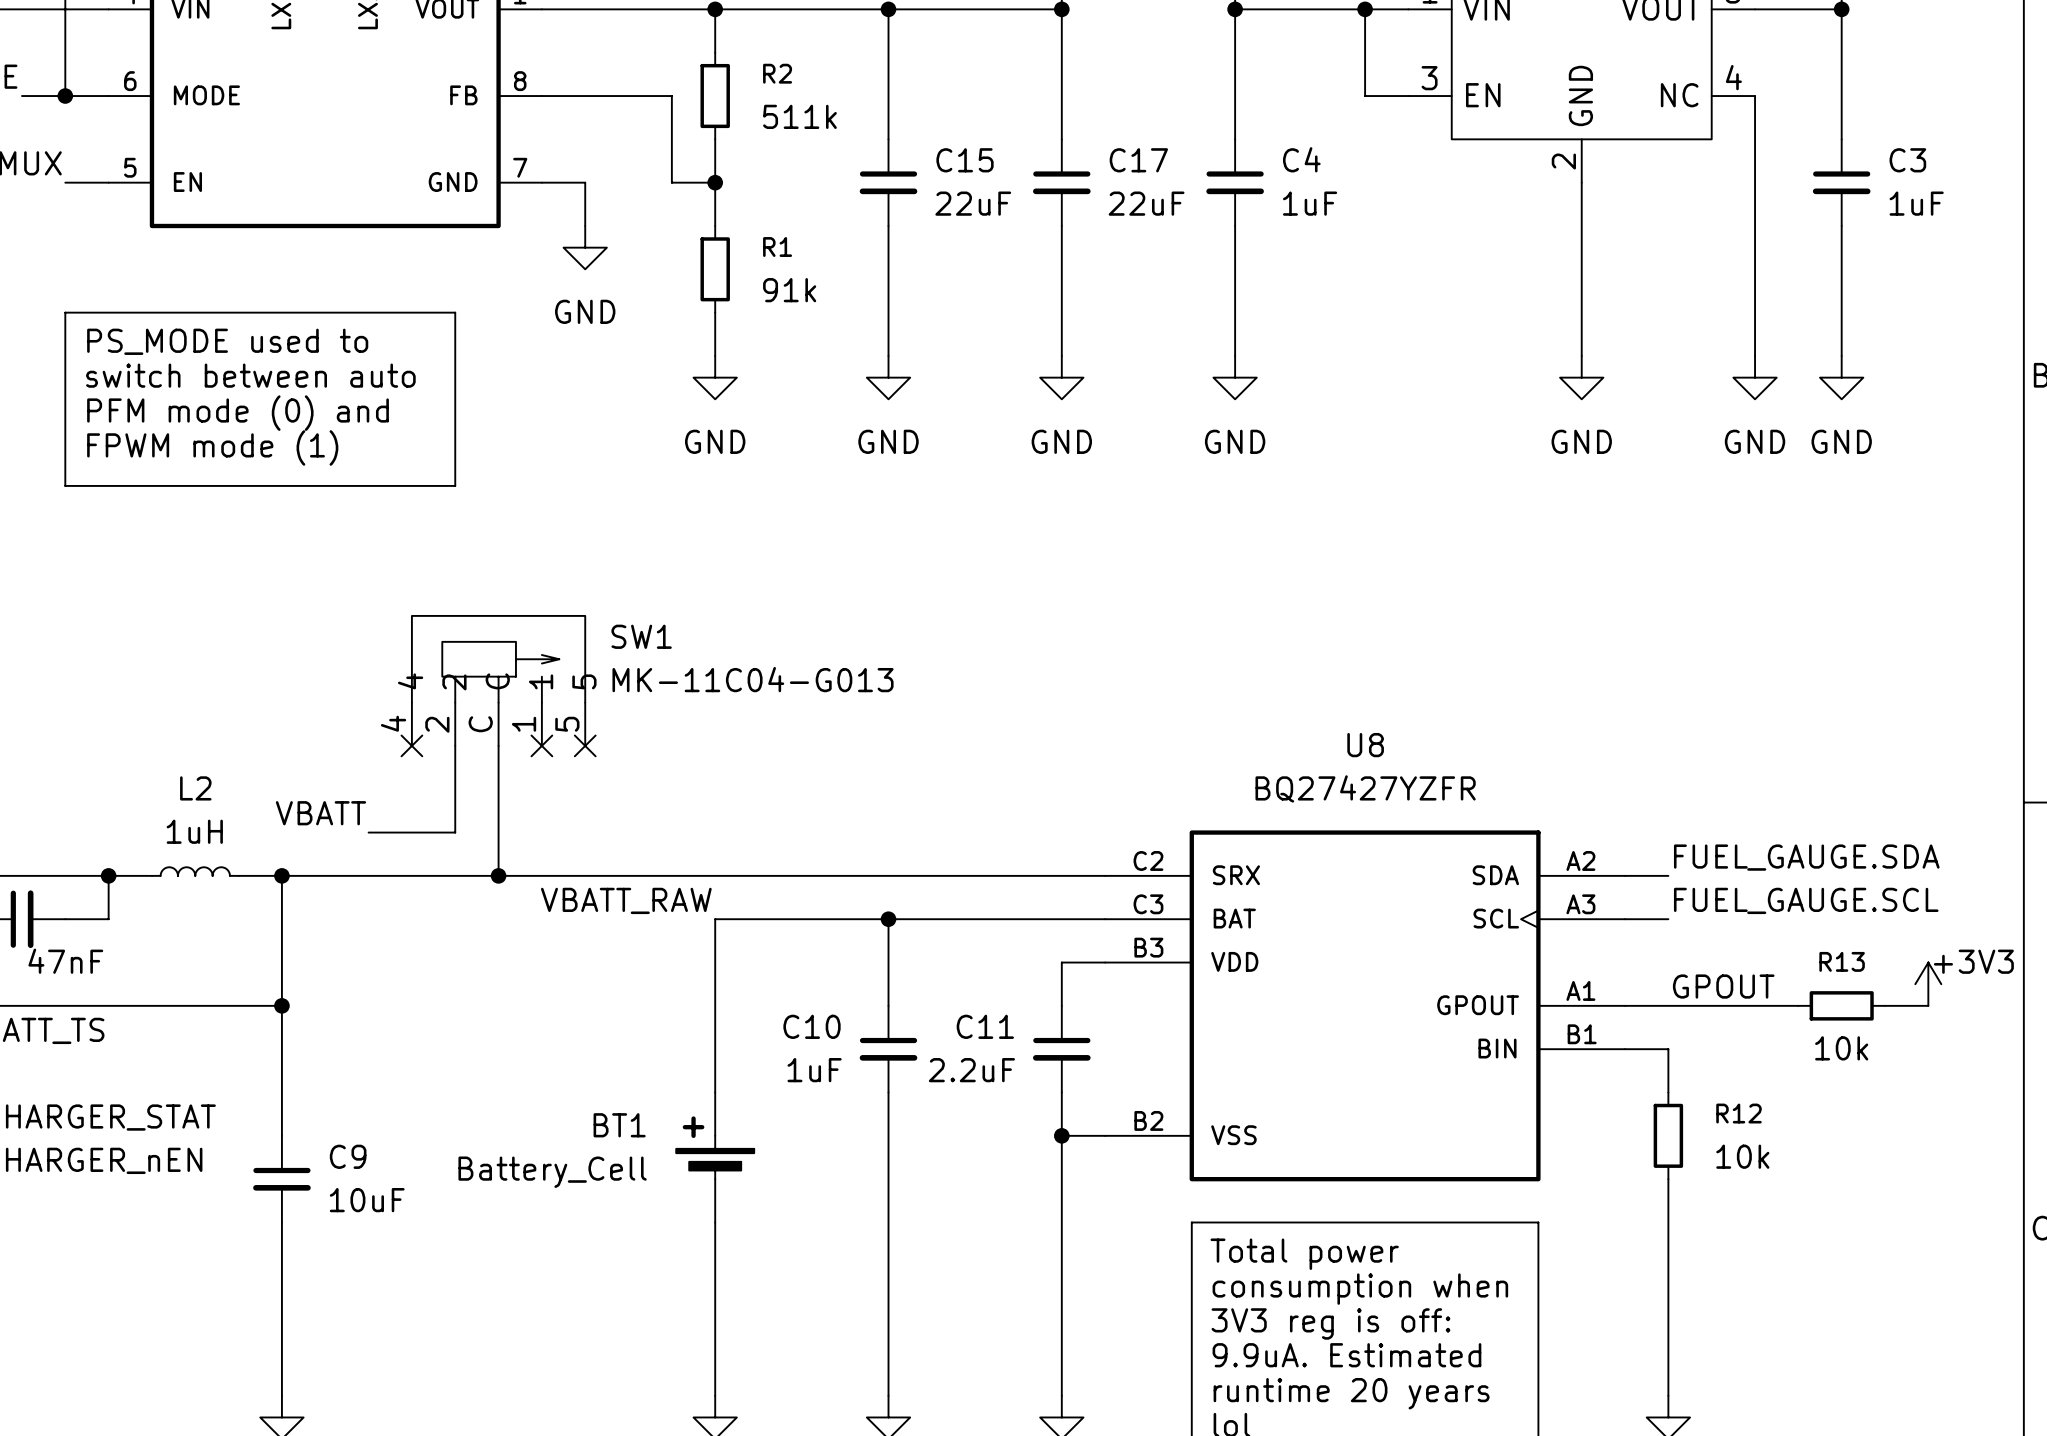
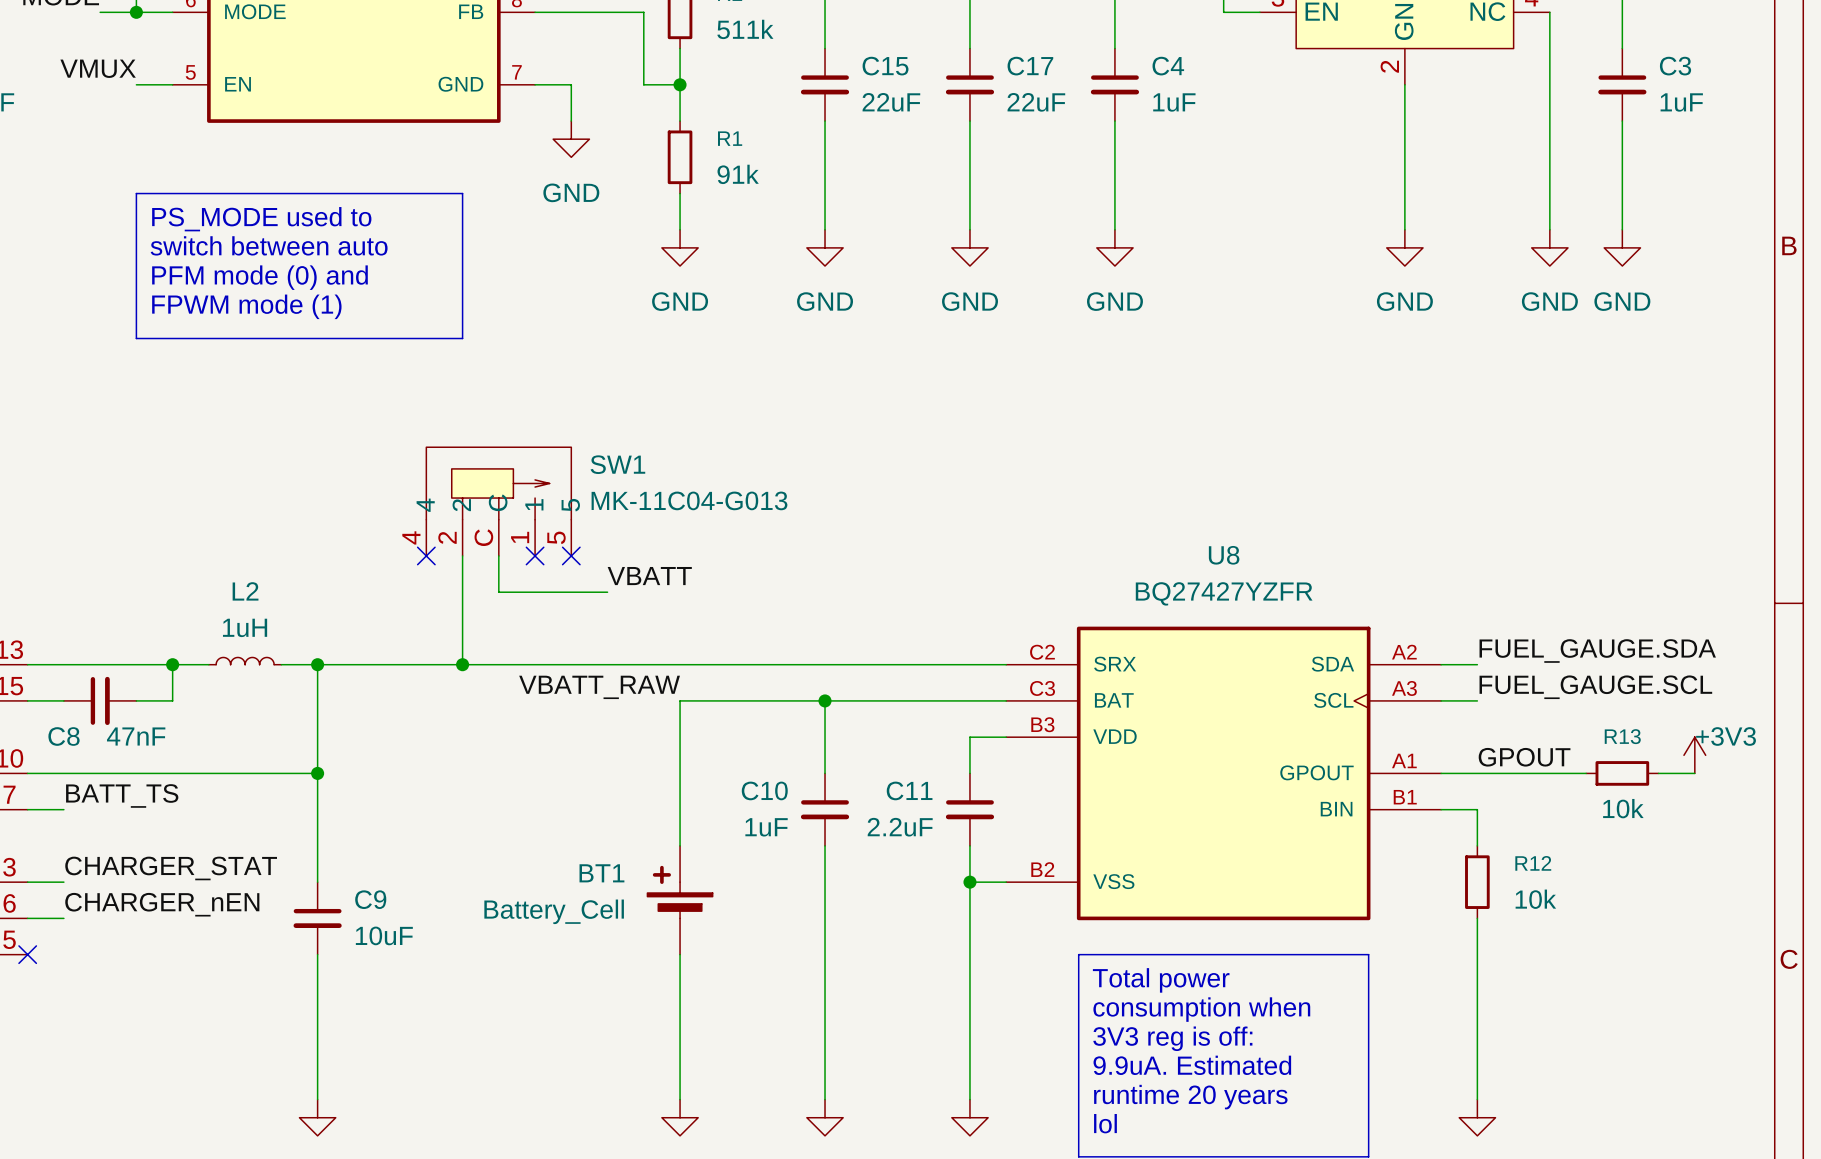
wire: (498, 789) (498, 875) -> (498, 592) (607, 592)
label position: VBATT (320, 813) -> VBATT (649, 576)
wire: (368, 832) (455, 832) -> (462, 664) (462, 628)
junction position: (498, 875) -> (462, 664)

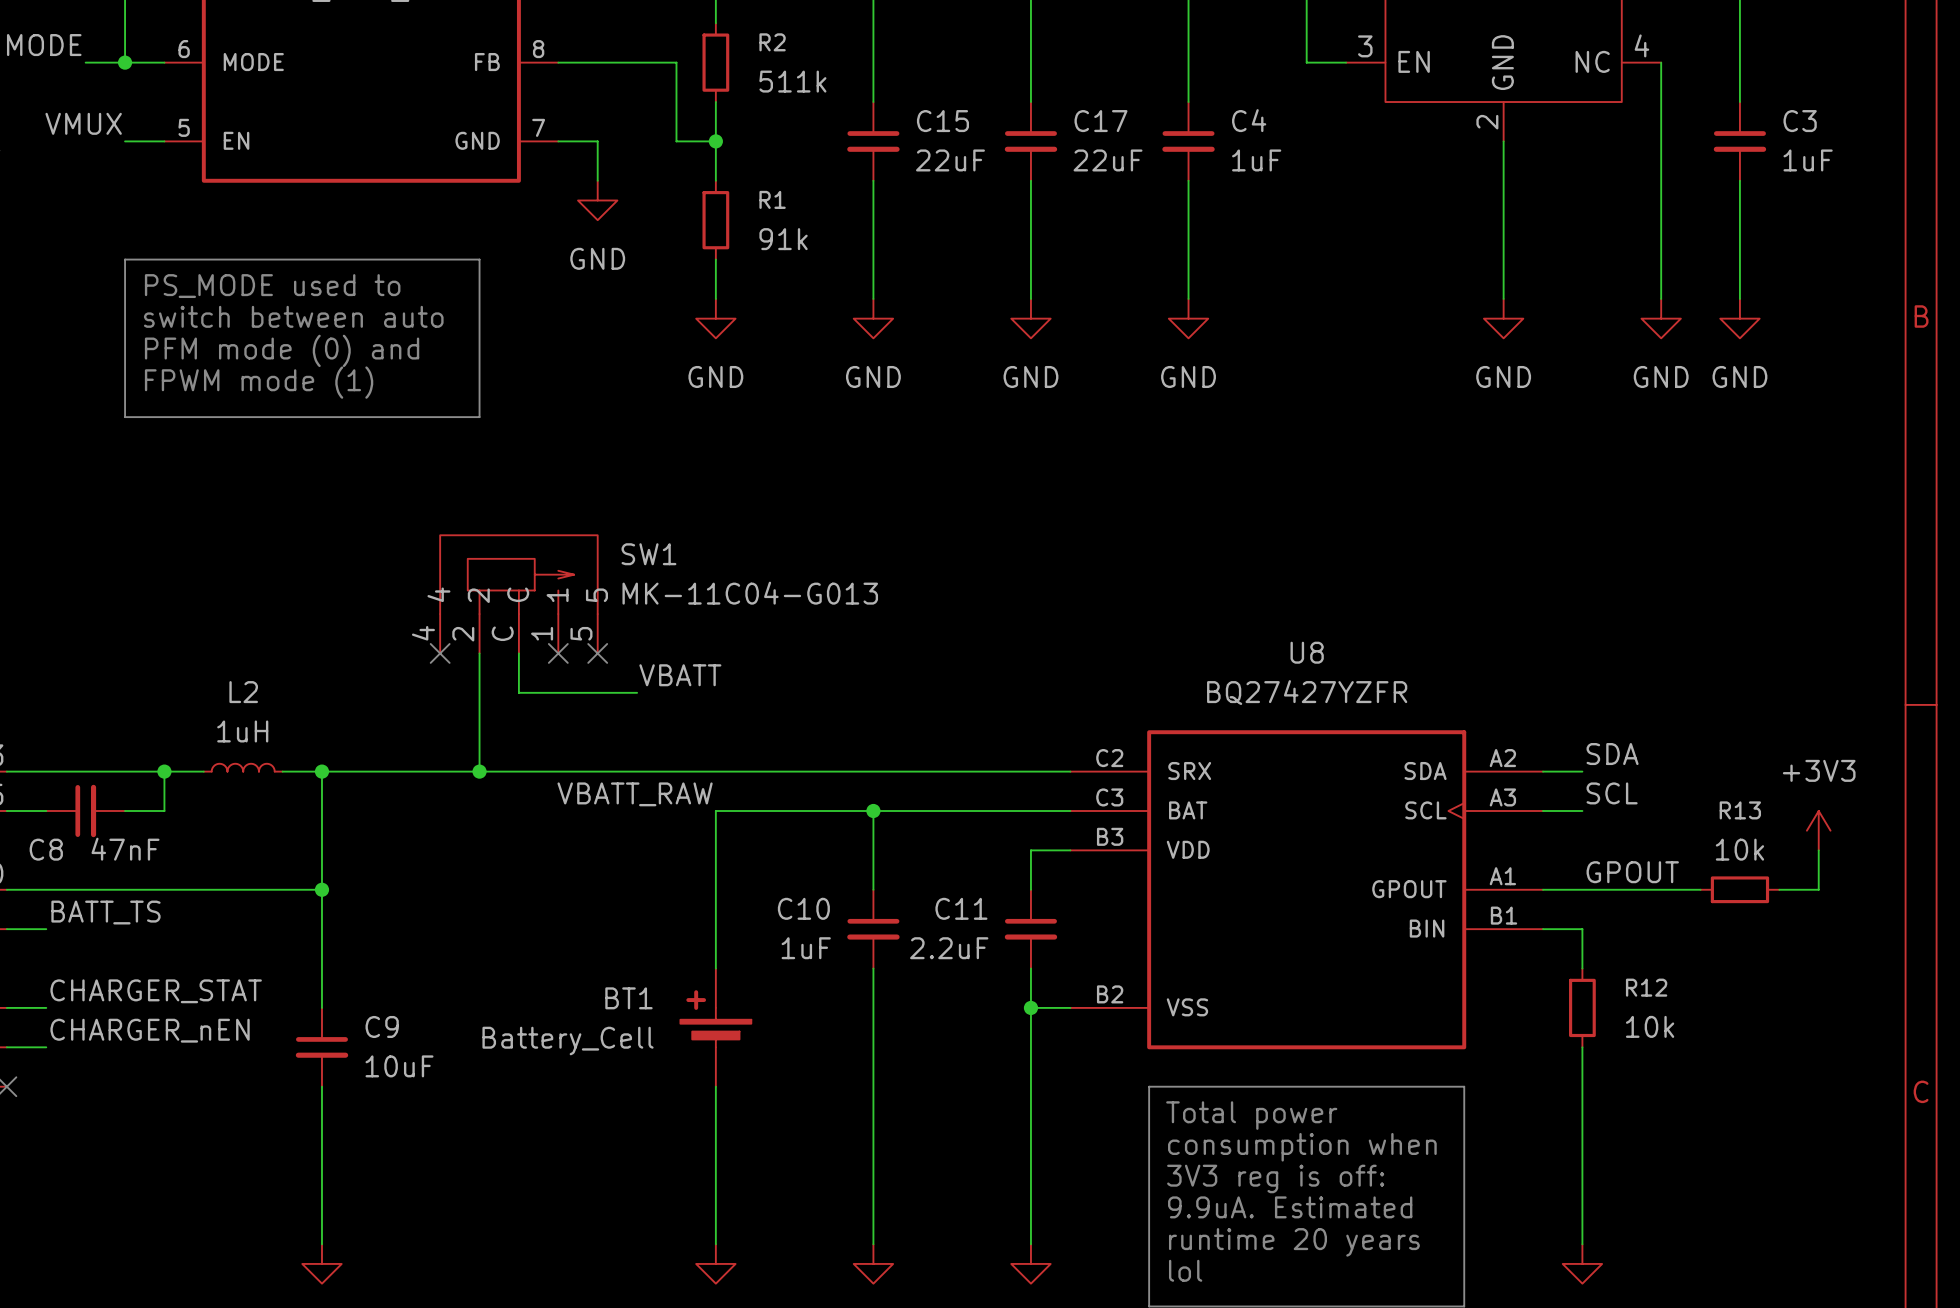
label: FUEL_GAUGE.SDA (1597, 651) -> SDA (1612, 754)
label: FUEL_GAUGE.SCL (1595, 687) -> SCL (1612, 793)
R13 name position: R13 (1622, 736) -> R13 (1740, 810)
power symbol text position: +3V3 (1726, 736) -> +3V3 (1819, 770)
power symbol position: +3V3 (1694, 755) -> +3V3 (1818, 830)
R13 value position: 10k (1623, 808) -> 10k (1739, 849)

